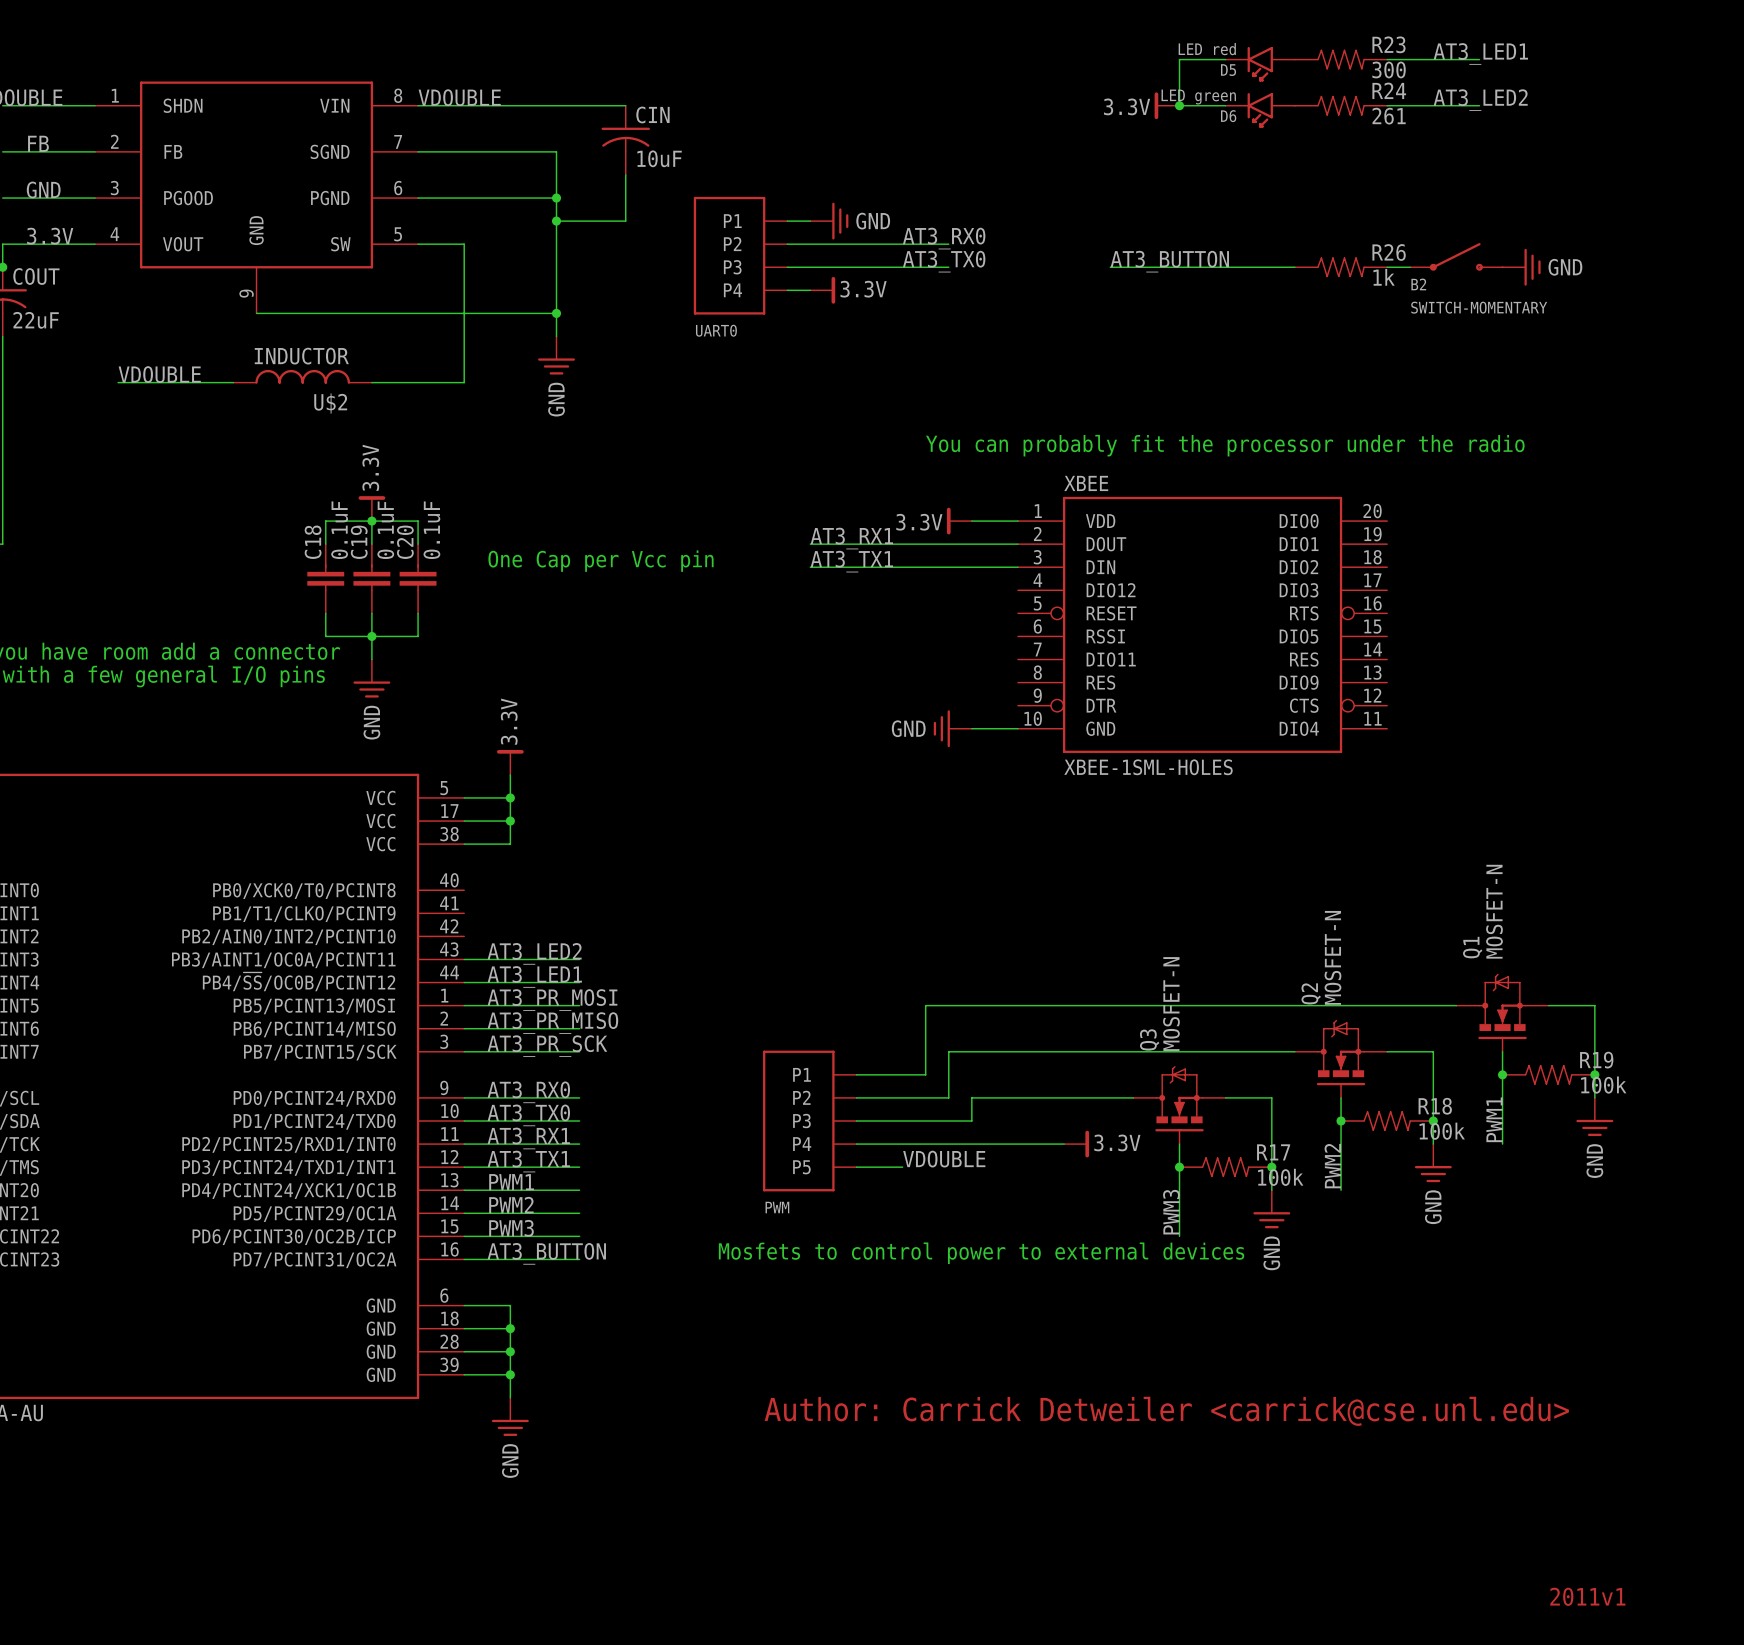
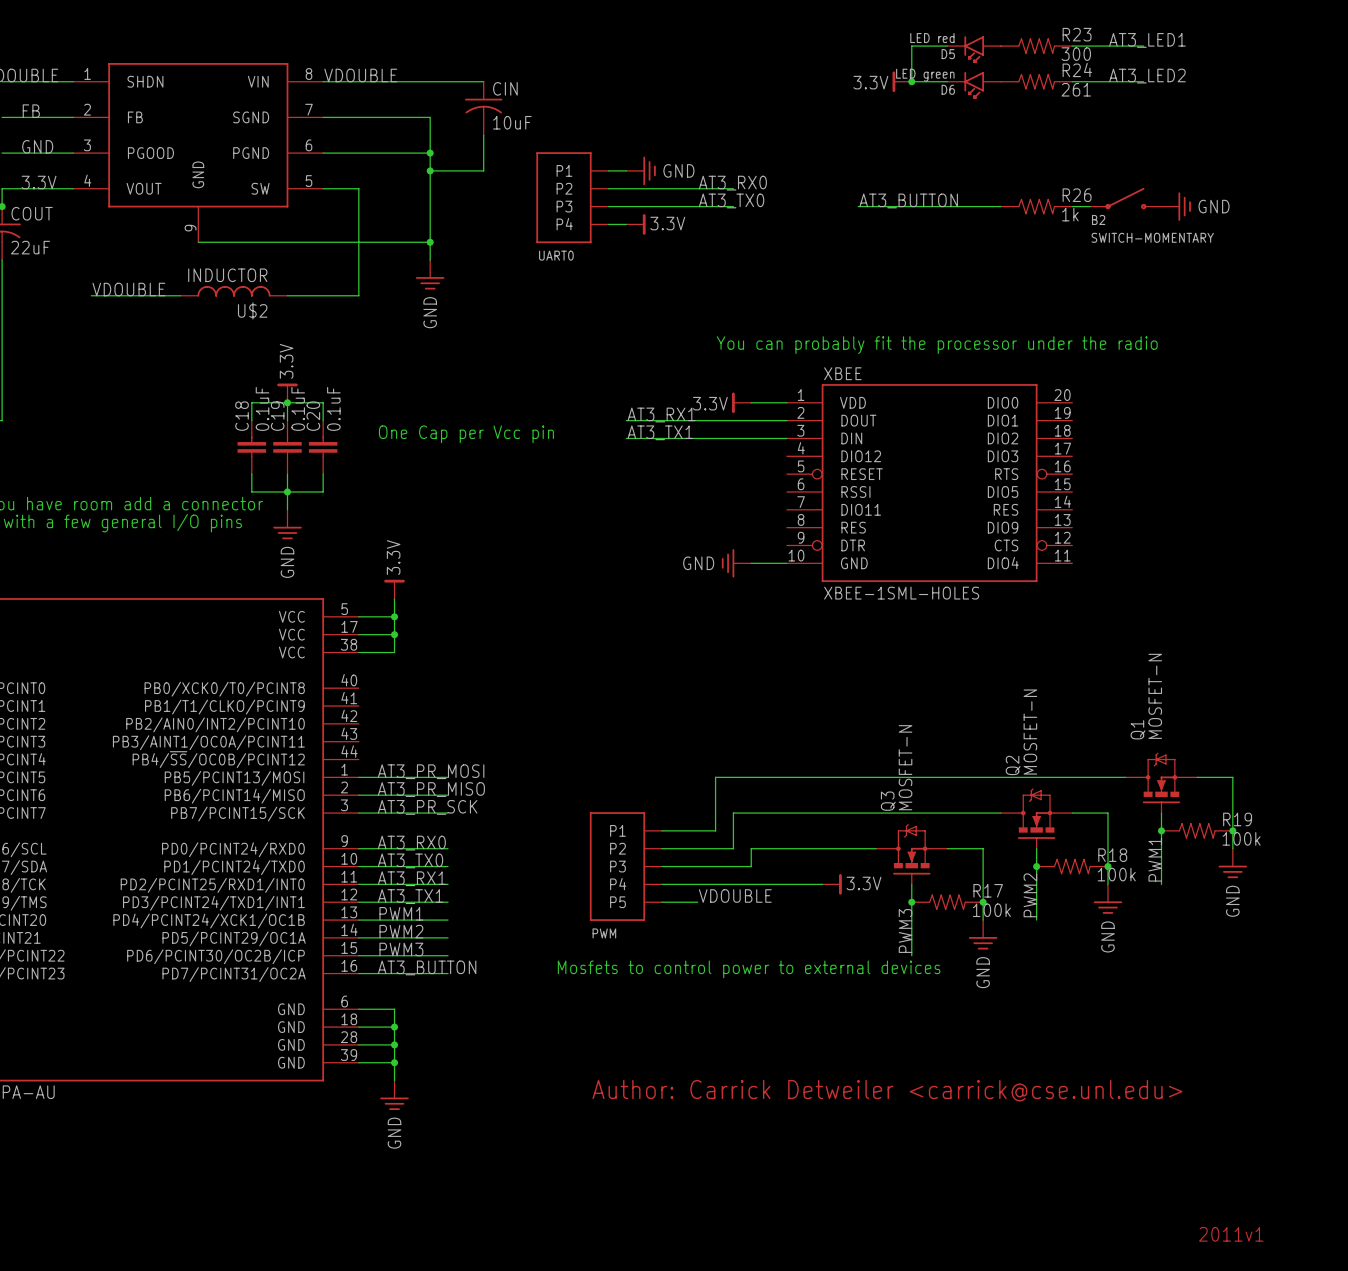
label: AT3_LED2 (534, 953) -> none
wire: (464, 959) (579, 959) -> none
label: AT3_LED1 (534, 976) -> none
wire: (464, 982) (579, 982) -> none

